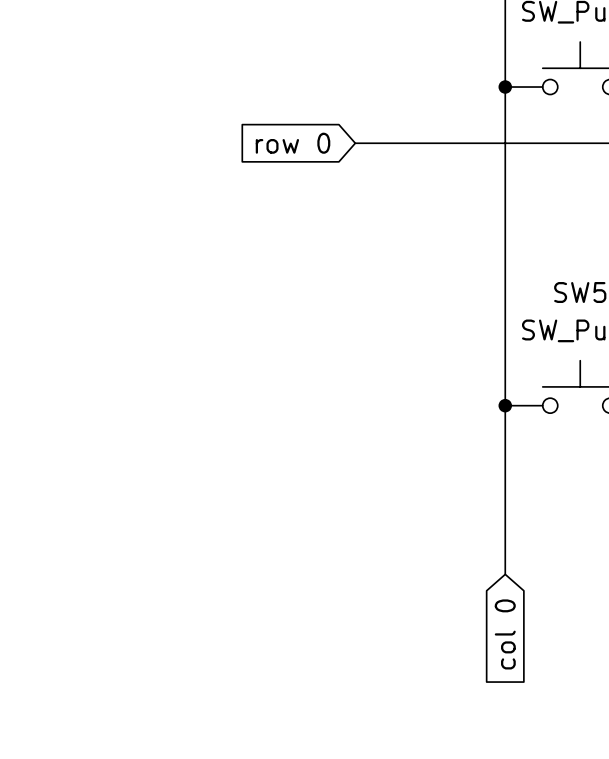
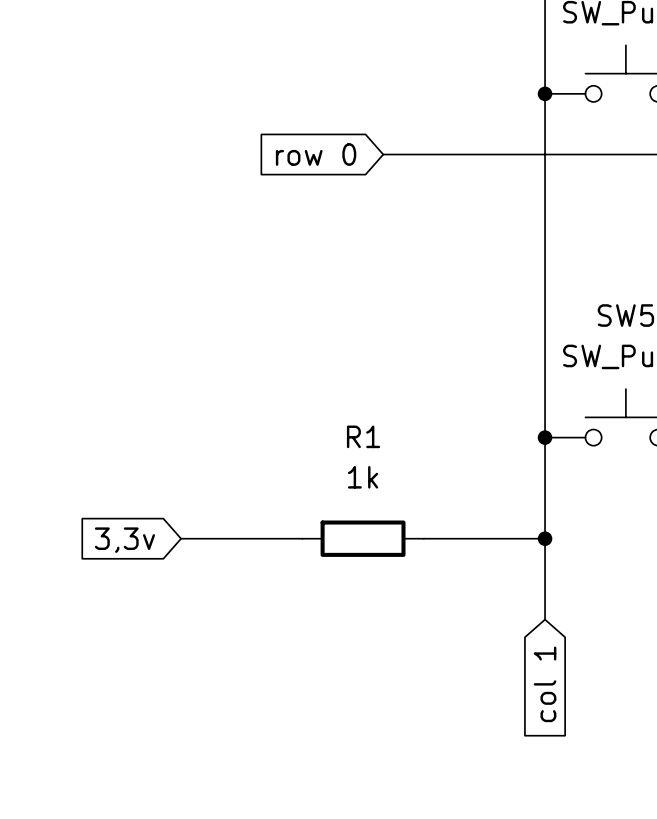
wire: none -> (181, 538) (302, 538)
R1: none -> 1k (363, 538)
wire: none -> (423, 538) (545, 538)
junction: none -> (545, 538)
global label: none -> 3,3v (124, 540)
global label: col 0 (505, 634) -> col 1 (545, 684)

